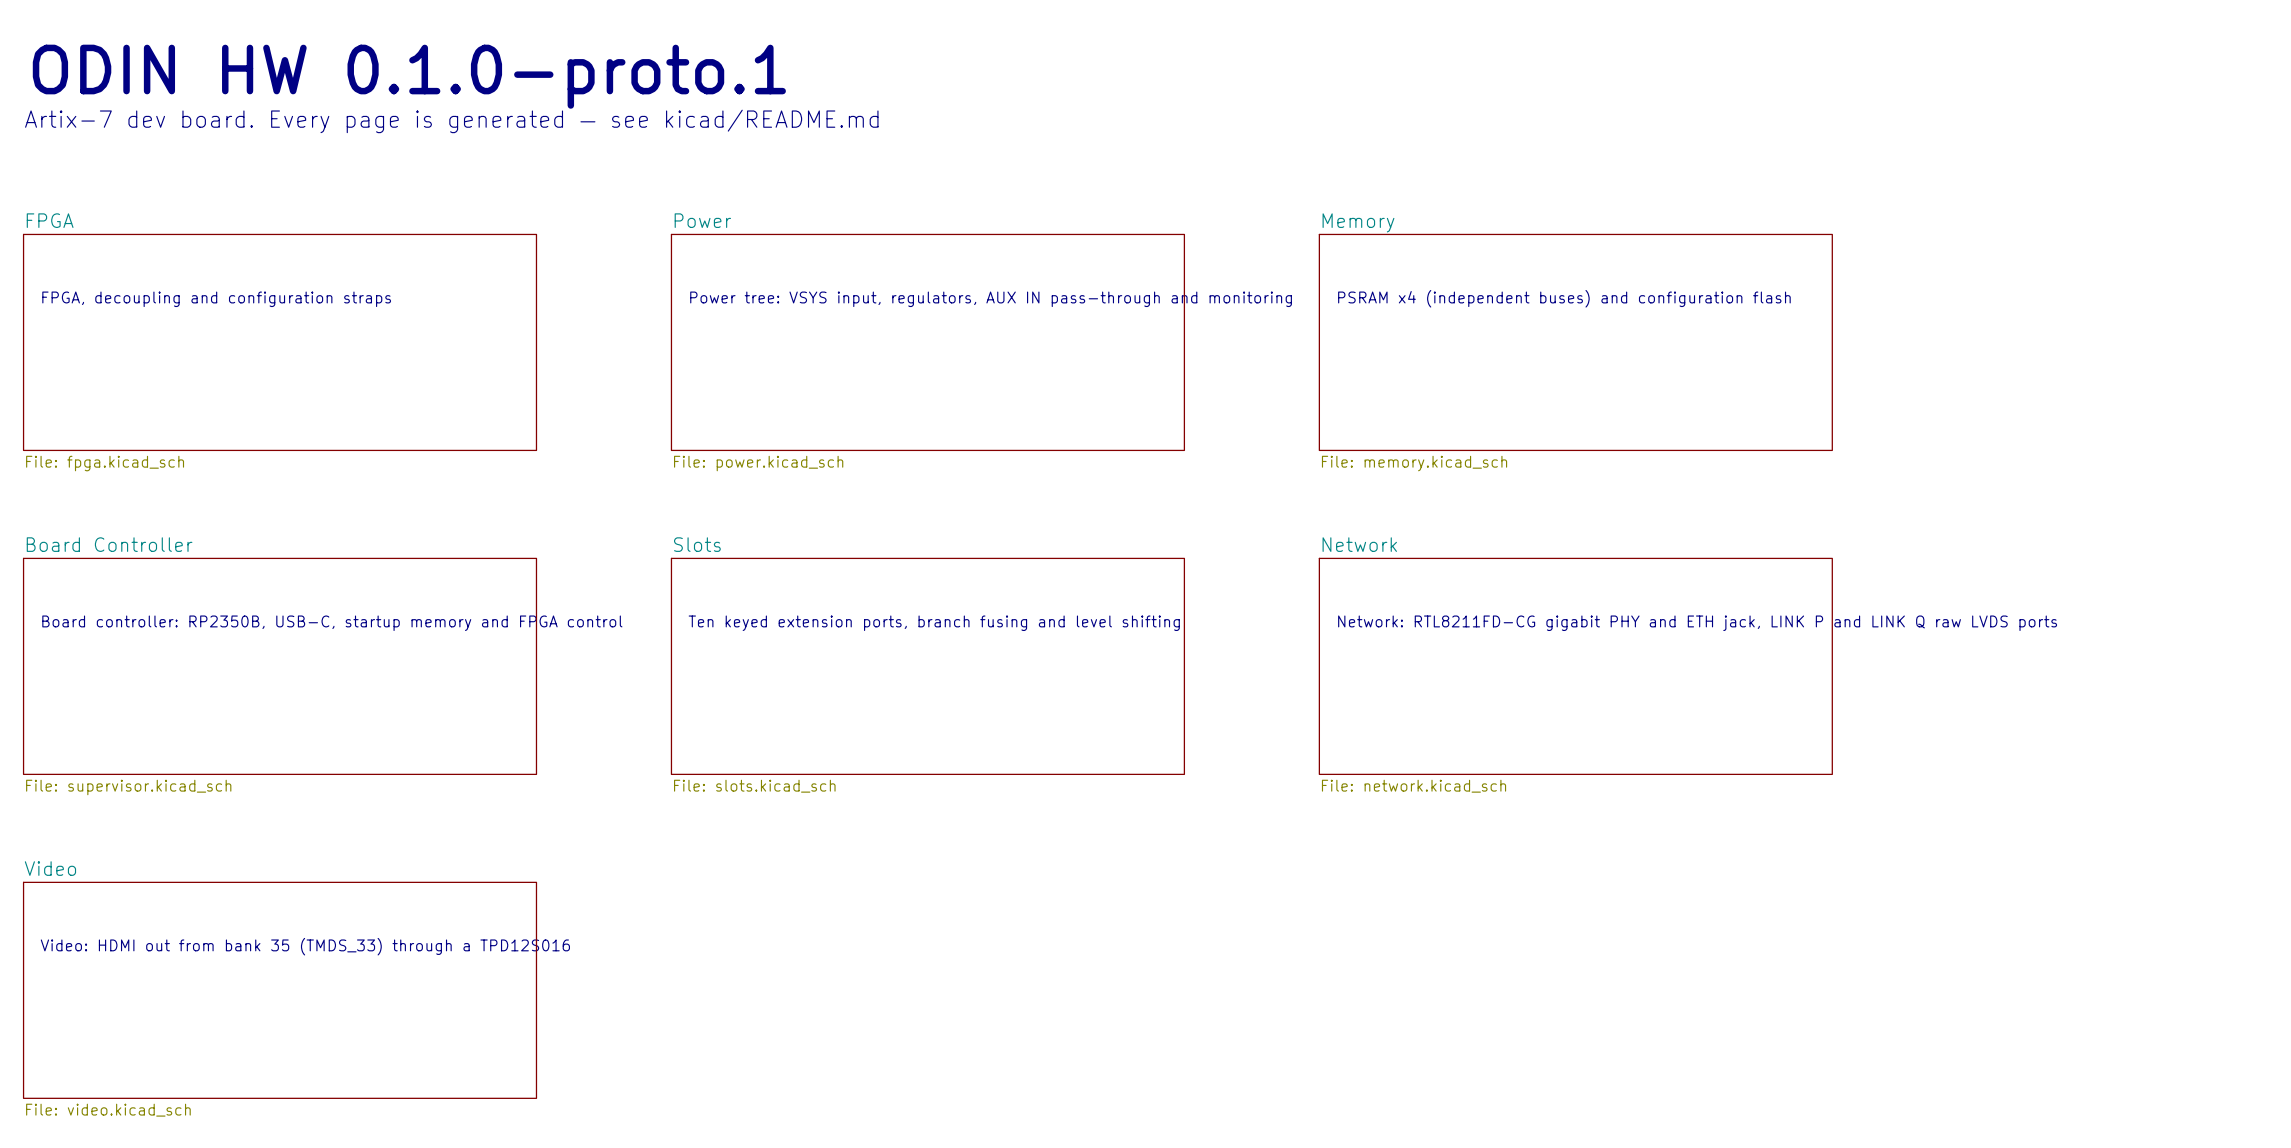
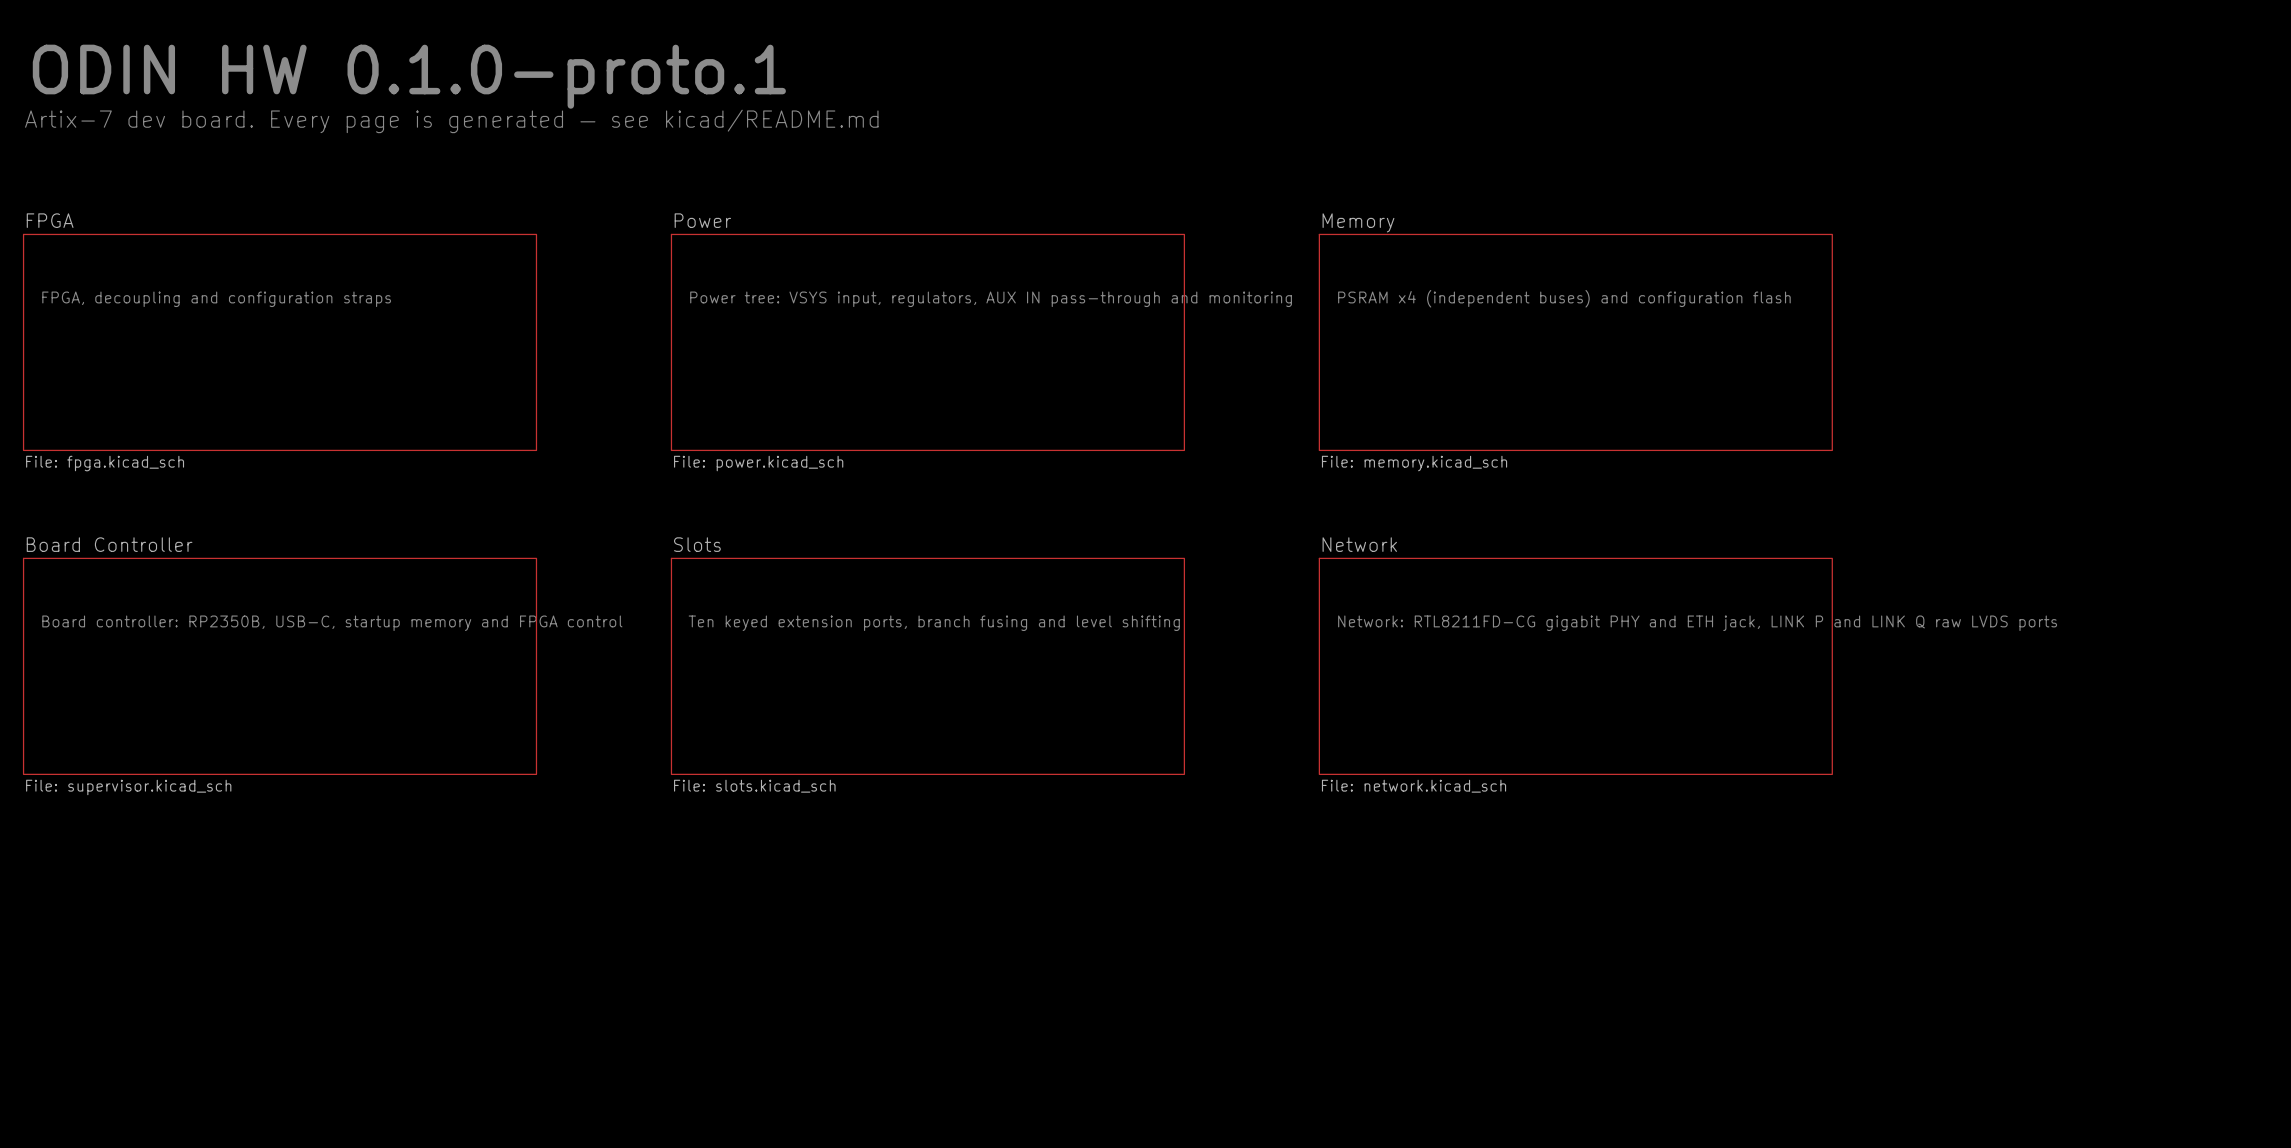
text: Video: HDMI out from bank 35 (TMDS_33) through a TPD12S016 (305, 946) -> none
sheet Video: File: video.kicad_sch (280, 990) -> none

